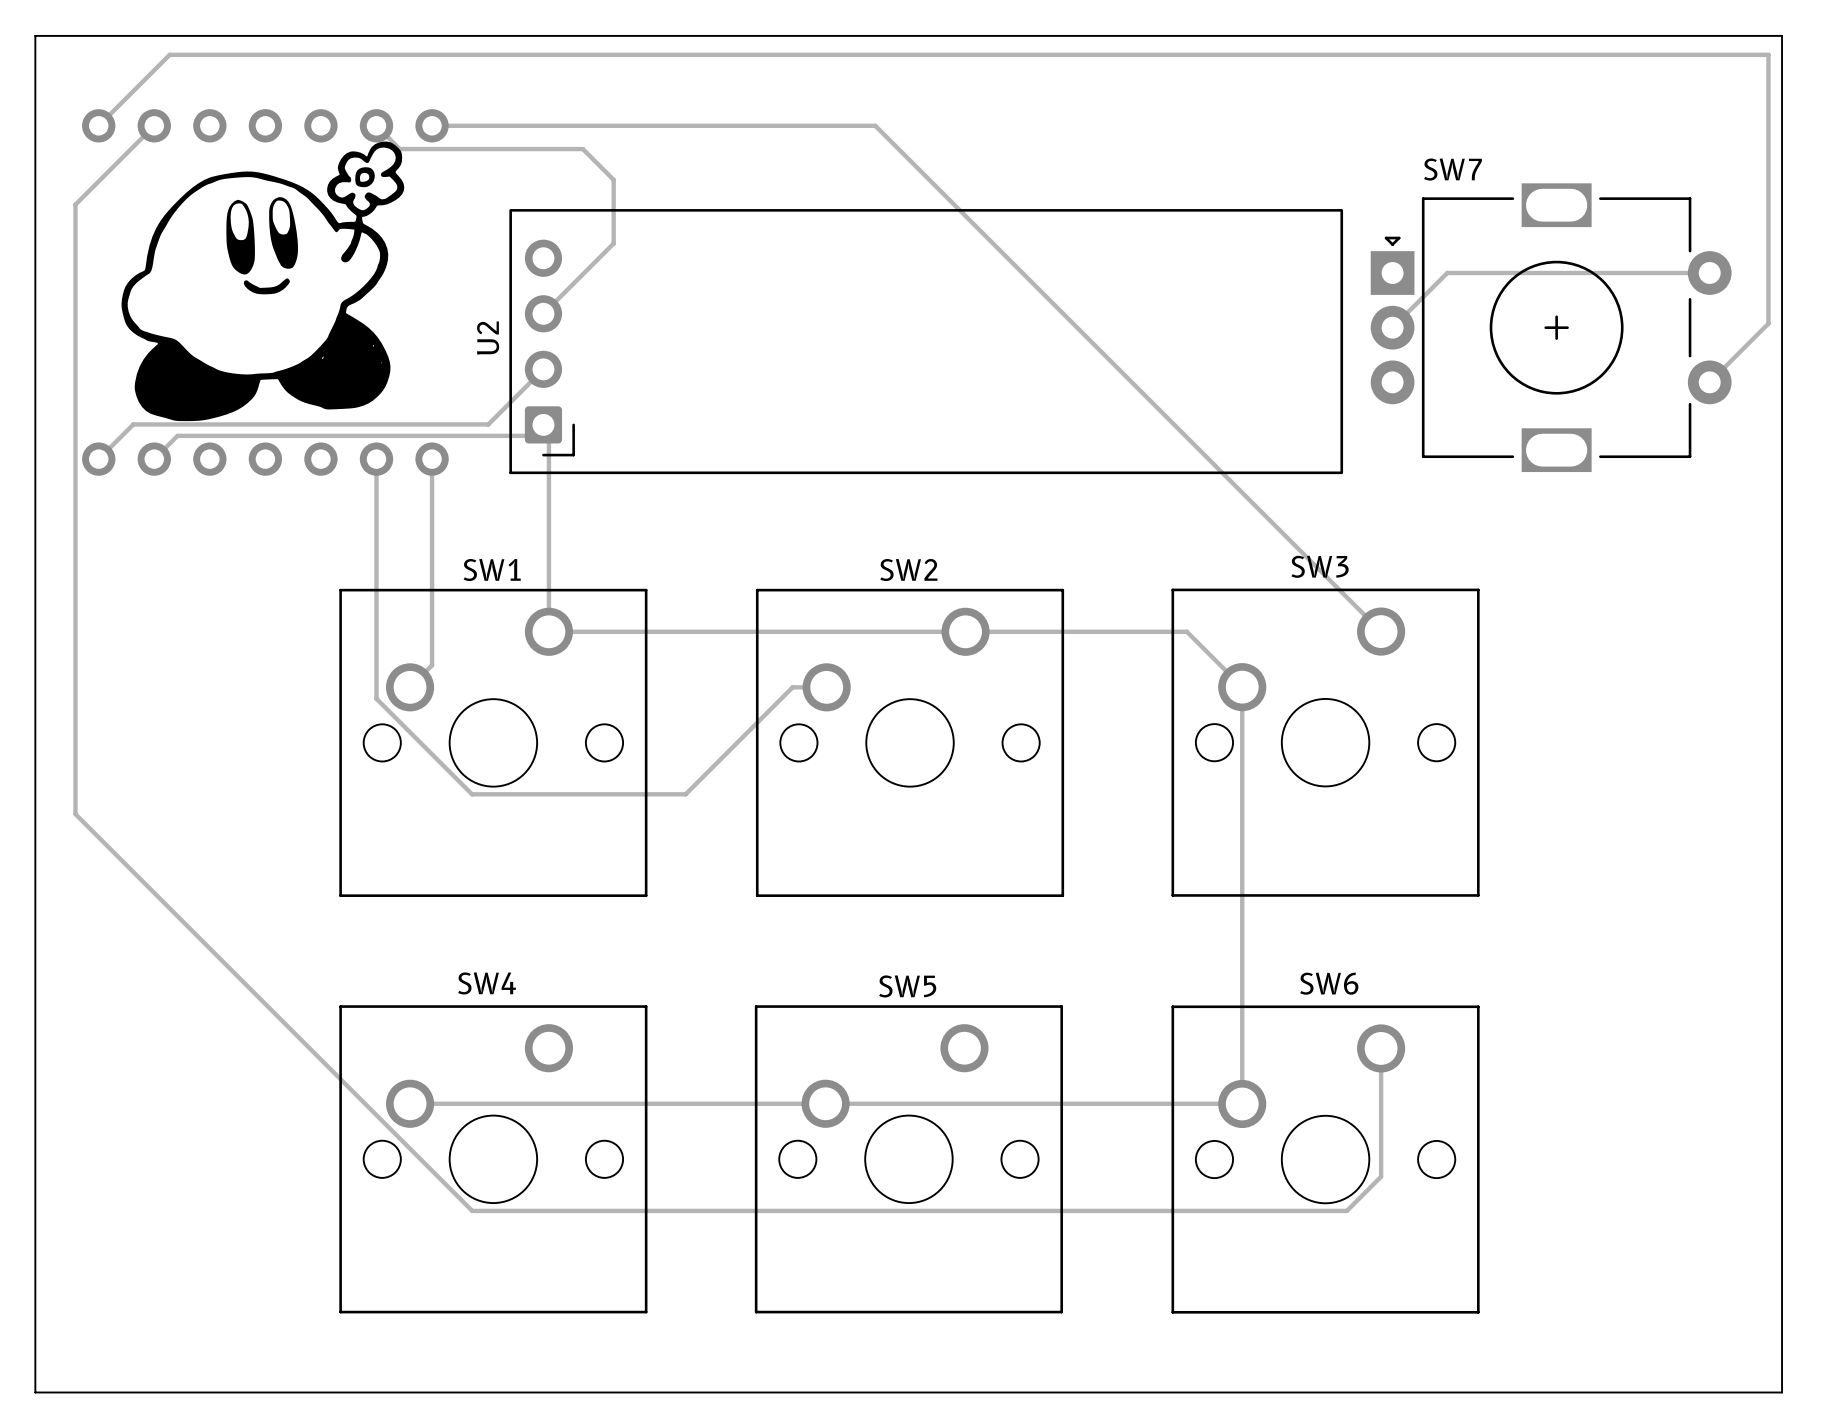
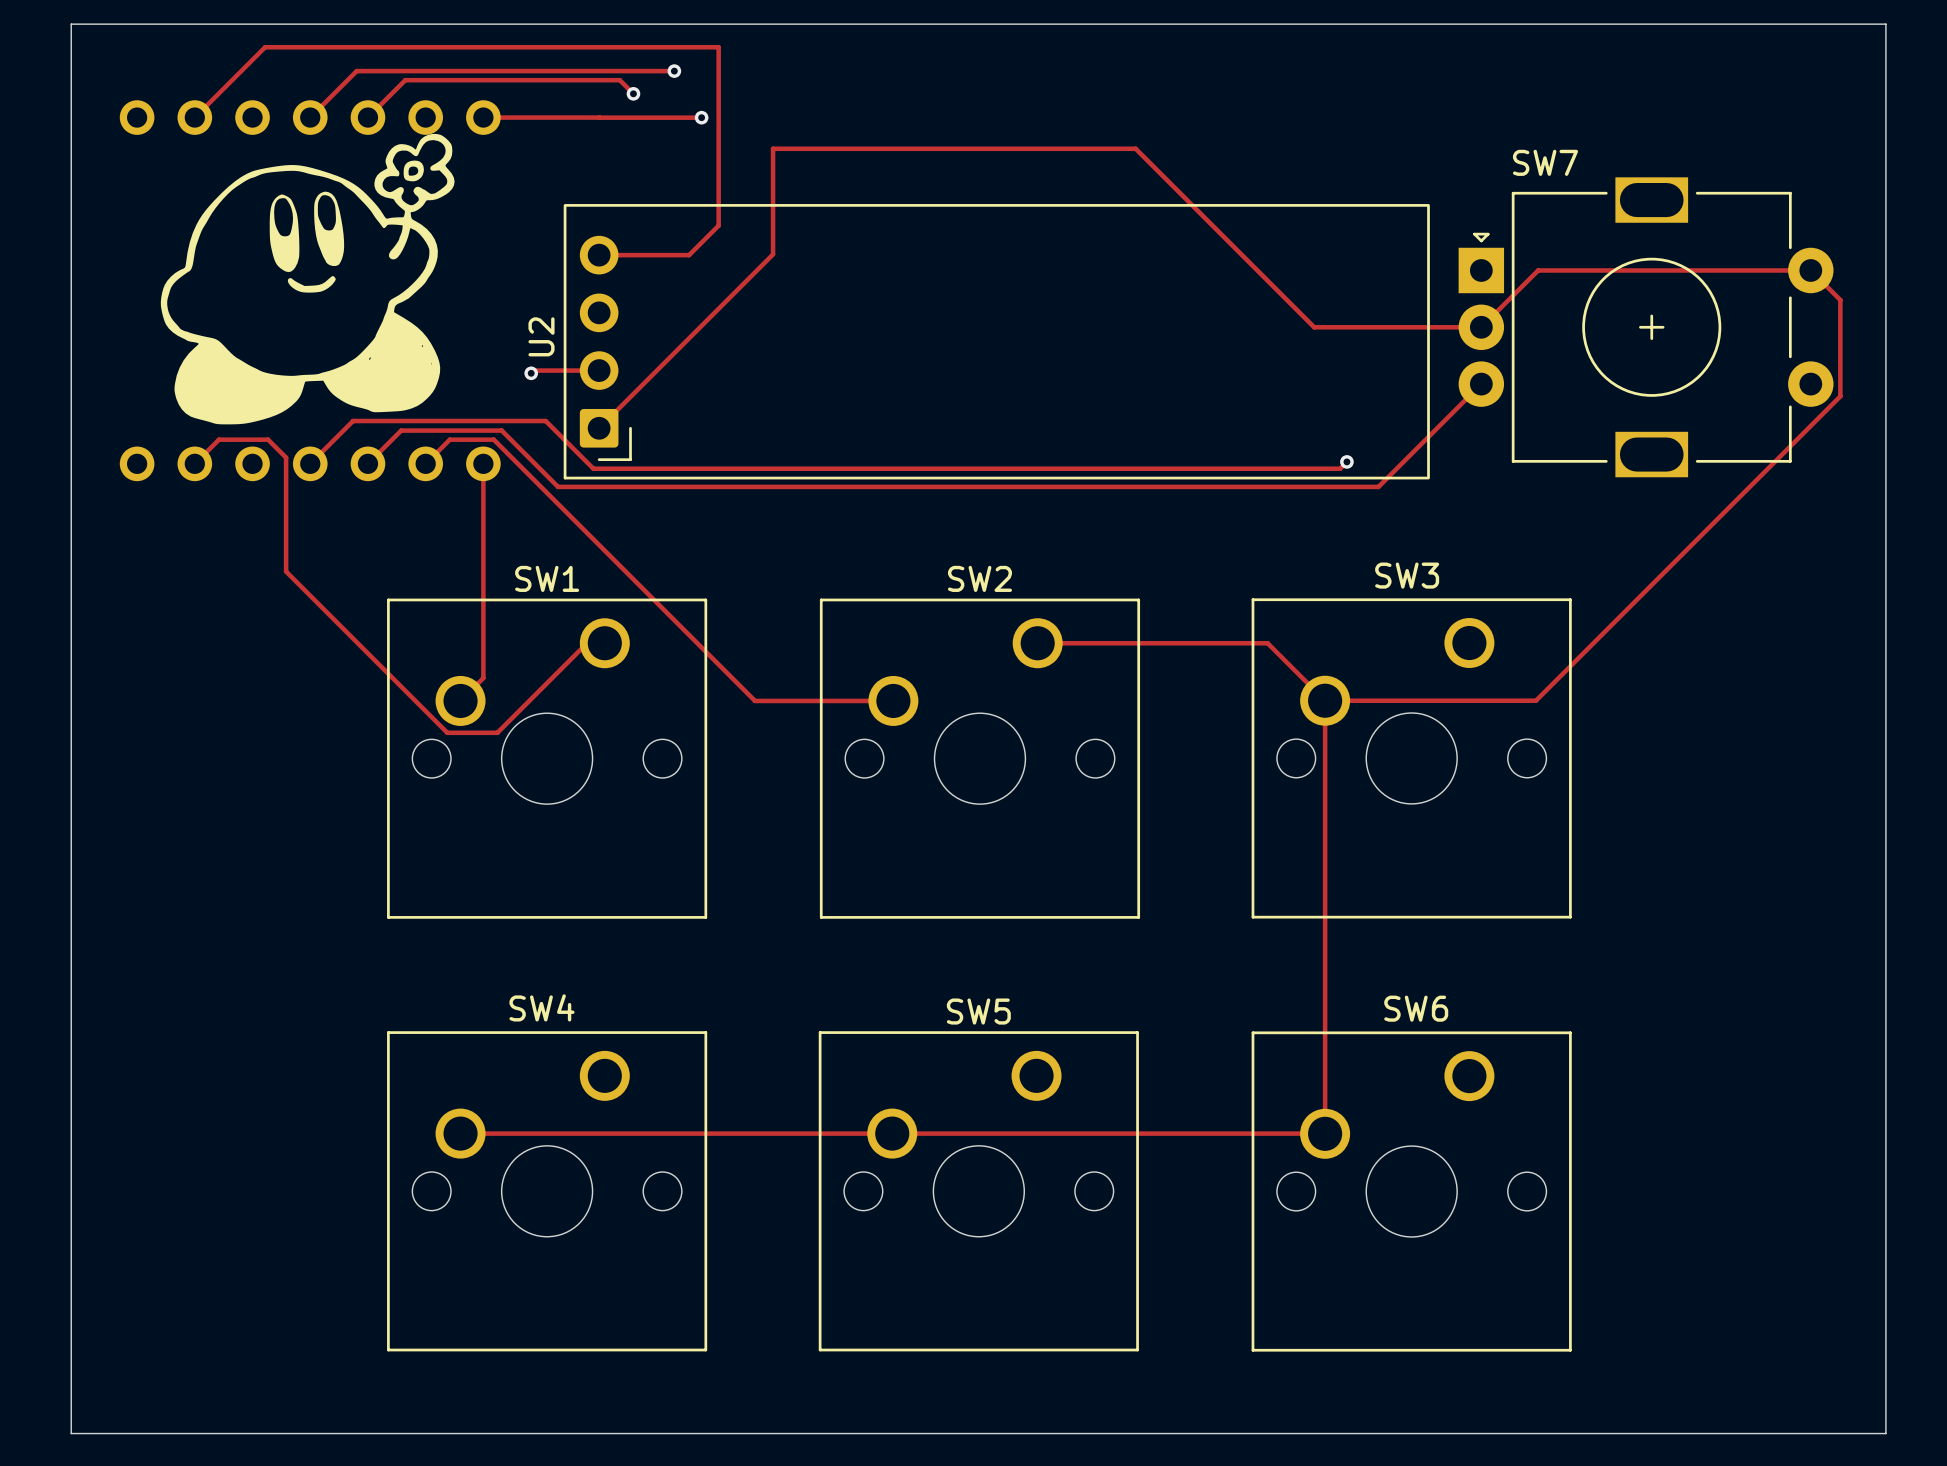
track: none -> (674, 71) (356, 71) (310, 117)
via: none -> (674, 71)
track: none -> (633, 93) (619, 80) (405, 80) (367, 117)
via: none -> (633, 93)
track: (98, 125) (169, 54) (1768, 54) (1768, 323) (1709, 382) -> none
track: (154, 125) (75, 204) (75, 814) (472, 1210) (1346, 1210) (1381, 1176) (1381, 1048) -> (194, 117) (265, 47) (718, 47) (718, 225) (689, 255) (599, 255)
track: (376, 125) (399, 149) (582, 149) (613, 179) (613, 243) (543, 313) -> none
track: (543, 125) (875, 125) (1381, 631) -> (599, 117) (701, 117)
via: none -> (701, 117)
track: none -> (1810, 270) (1840, 300) (1840, 396) (1535, 700) (1325, 700)
track: none -> (1481, 327) (1314, 327) (1135, 148) (773, 148) (773, 254) (599, 428)
track: (543, 369) (488, 424) (133, 424) (98, 459) -> (599, 370) (533, 370) (531, 373)
via: none -> (531, 373)
track: none -> (1481, 384) (1378, 486) (558, 486) (501, 430) (401, 430) (367, 463)
track: (224, 435) (399, 435) -> (425, 463) (449, 439)
track: none -> (268, 439) (286, 457) (286, 571) (447, 732) (497, 732) (586, 643) (604, 643)
track: (442, 435) (532, 435) (543, 424) (548, 430) (548, 631) (965, 631) -> none
track: none -> (1346, 461) (1340, 468) (593, 468) (545, 421) (353, 421) (310, 463)
via: none -> (1346, 461)
track: (376, 459) (376, 698) (472, 794) (685, 794) (792, 687) -> (493, 439) (755, 700) (858, 700)

